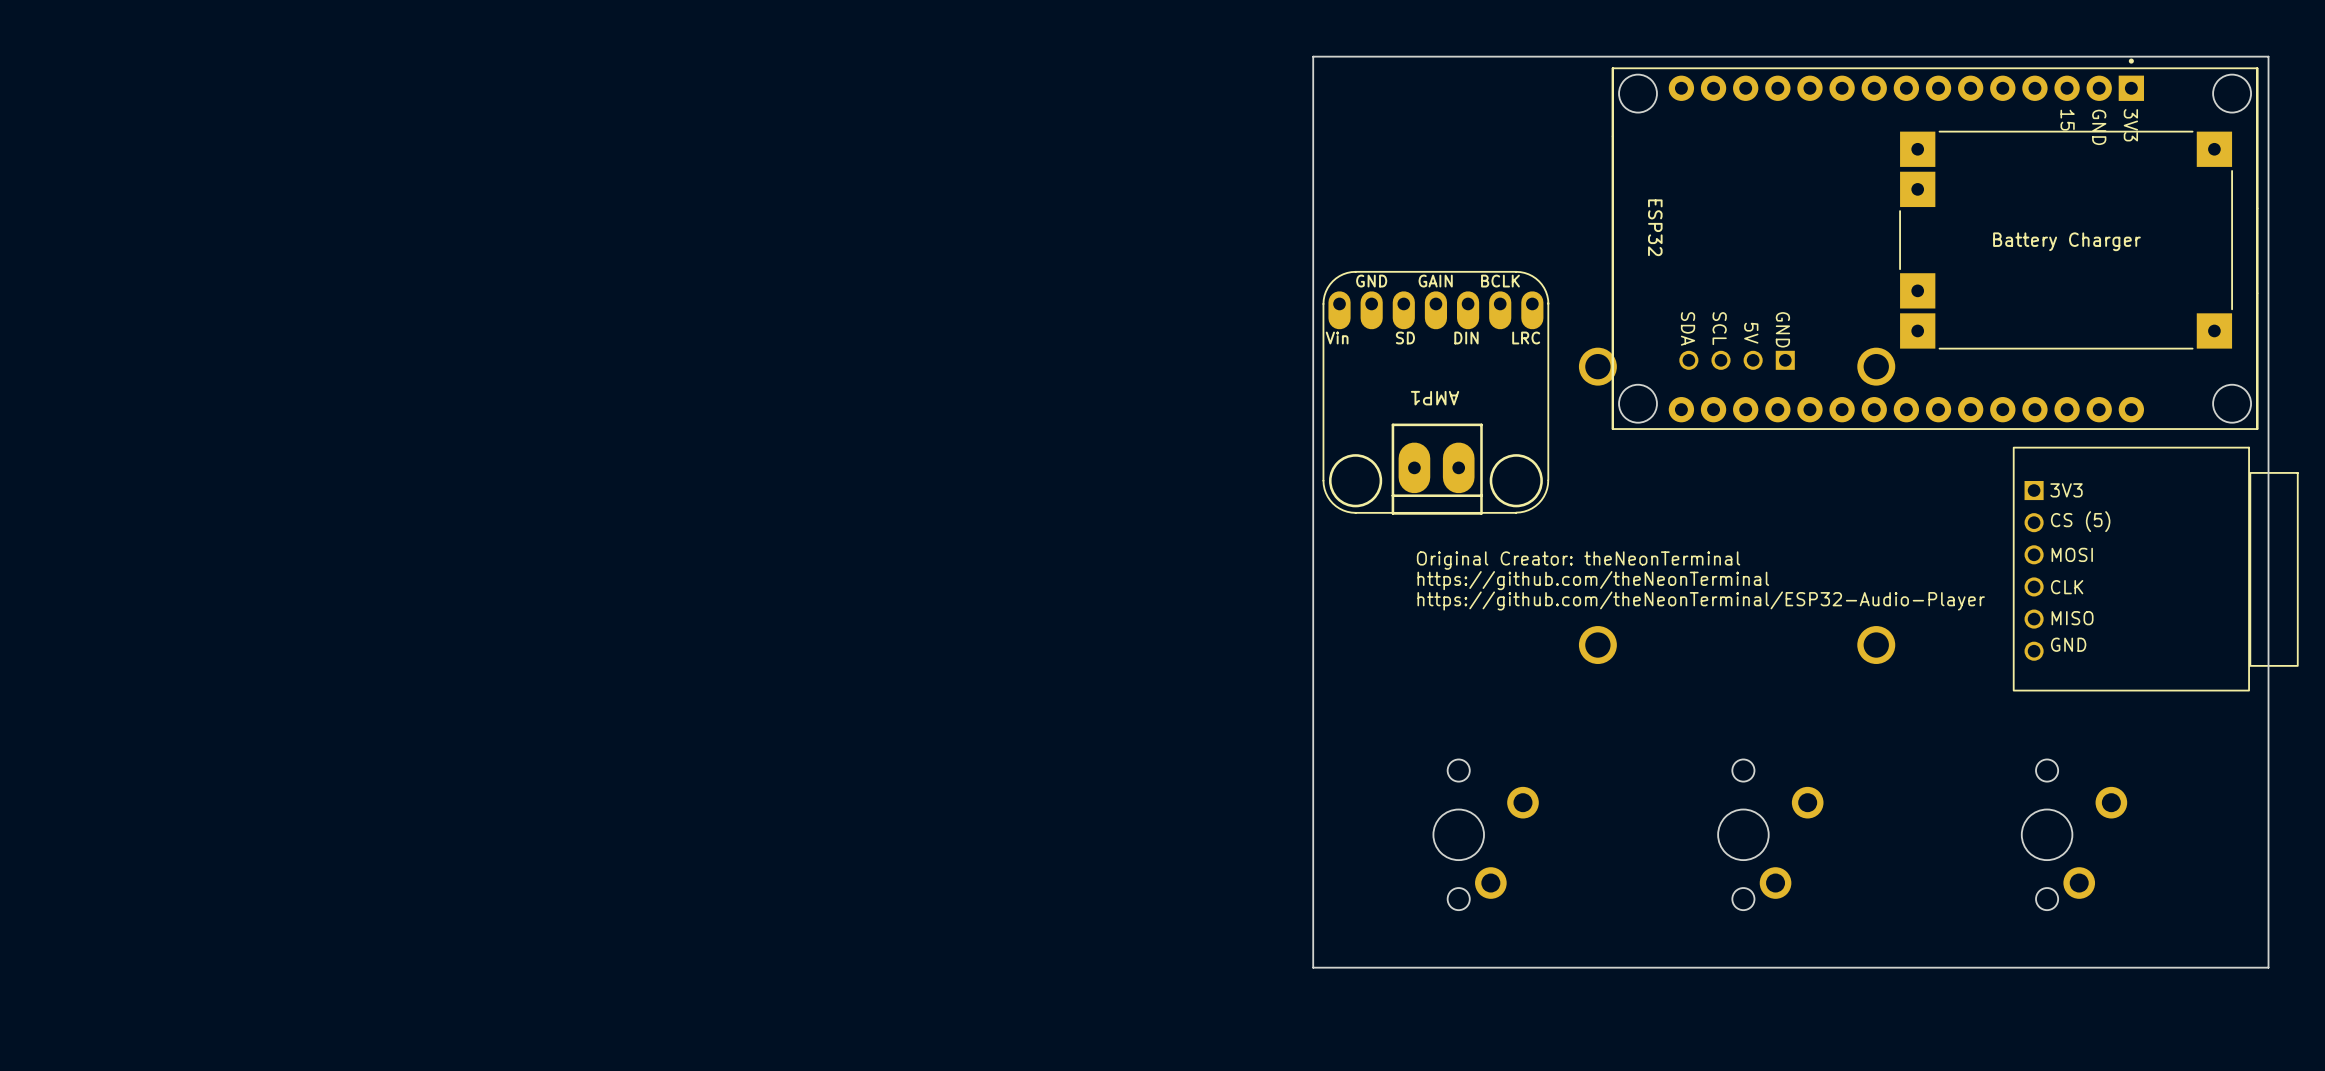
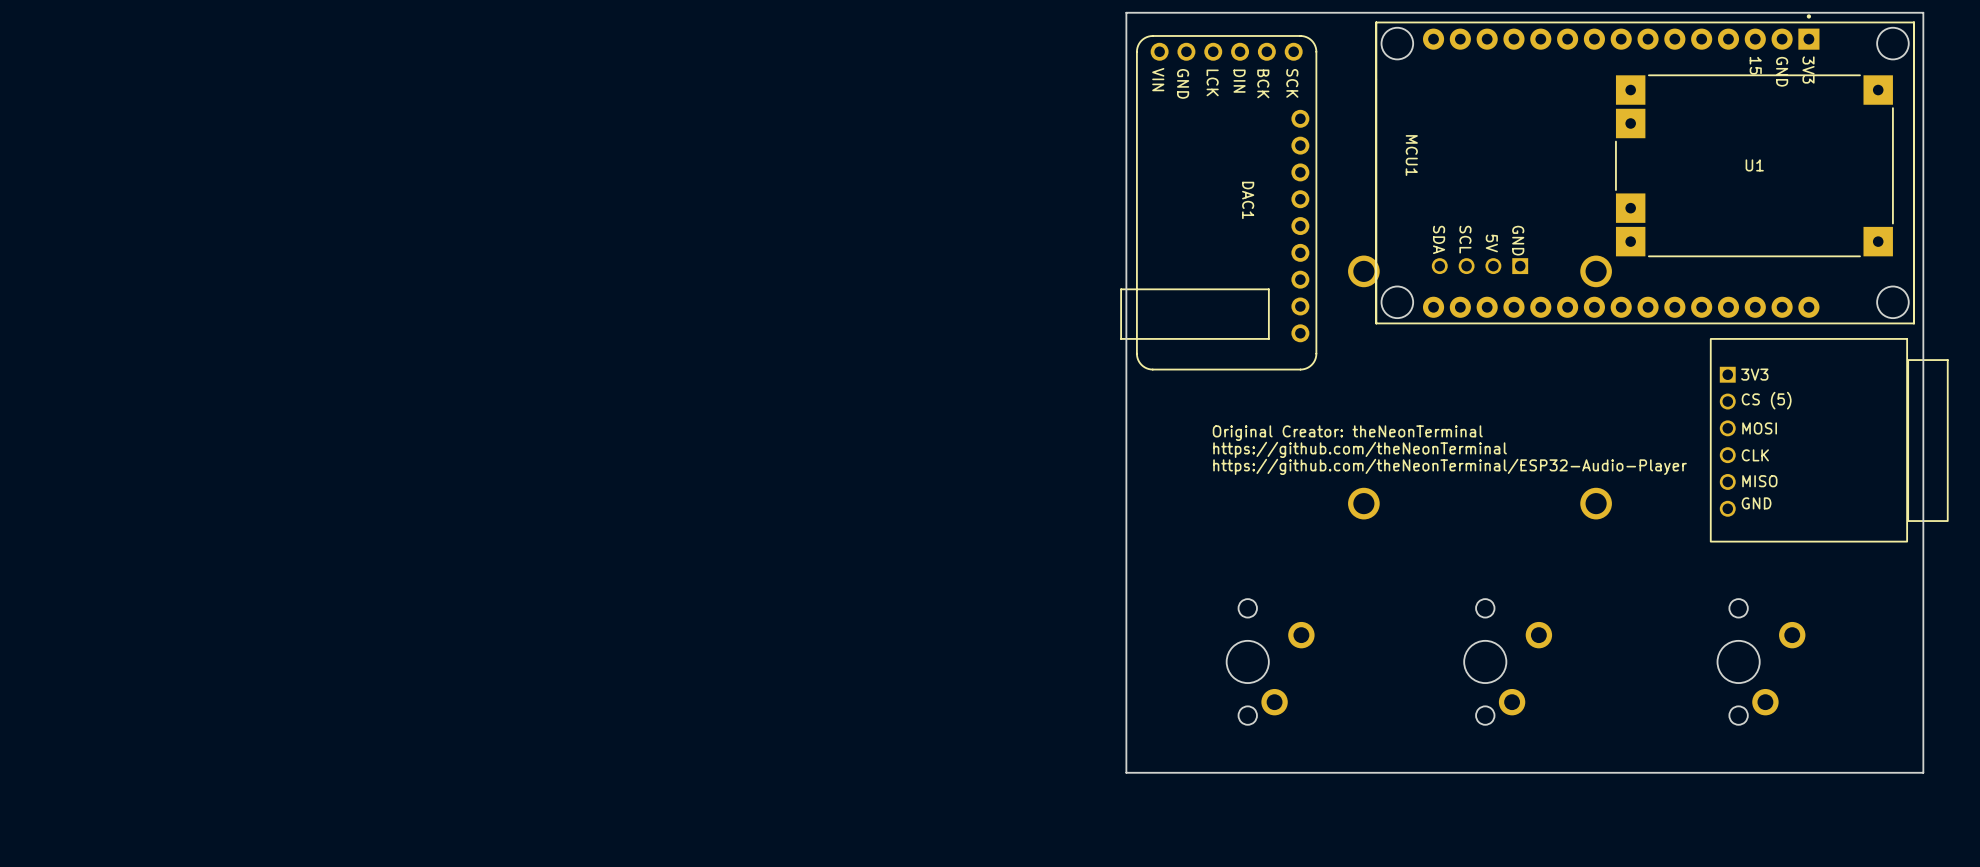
ESP32 name: ESP32 (1655, 227) -> MCU1 (1411, 155)
Battery Charger name: Battery Charger (2066, 241) -> U1 (1754, 165)
DAC1: none -> (1218, 202)
AMP1: (1435, 393) -> none

